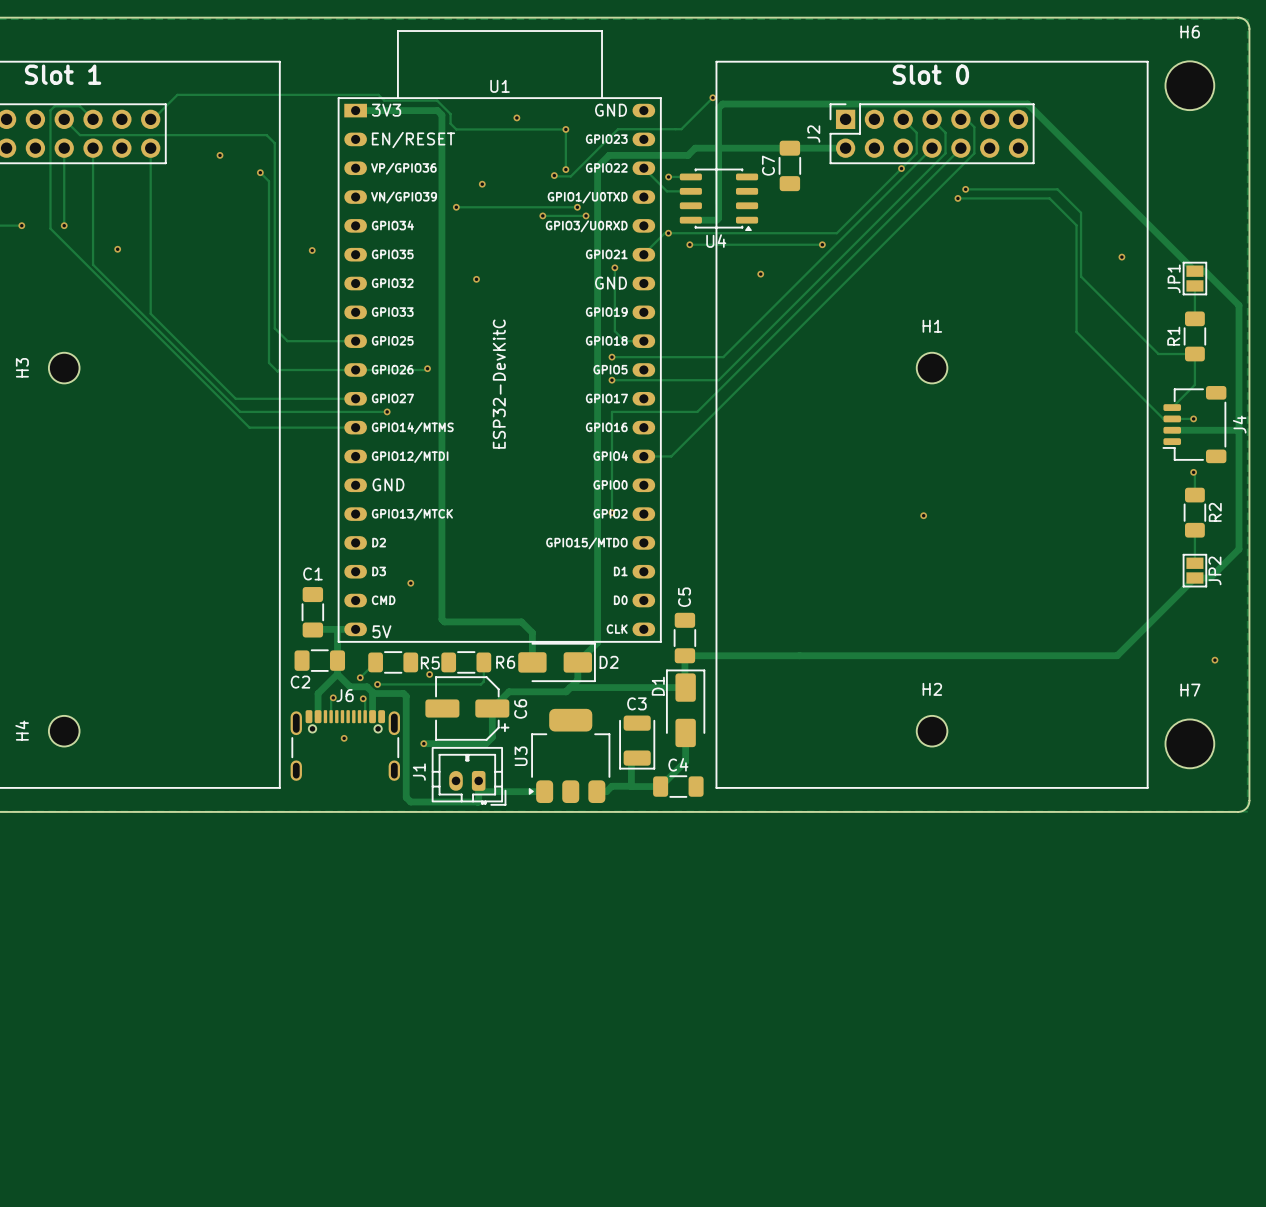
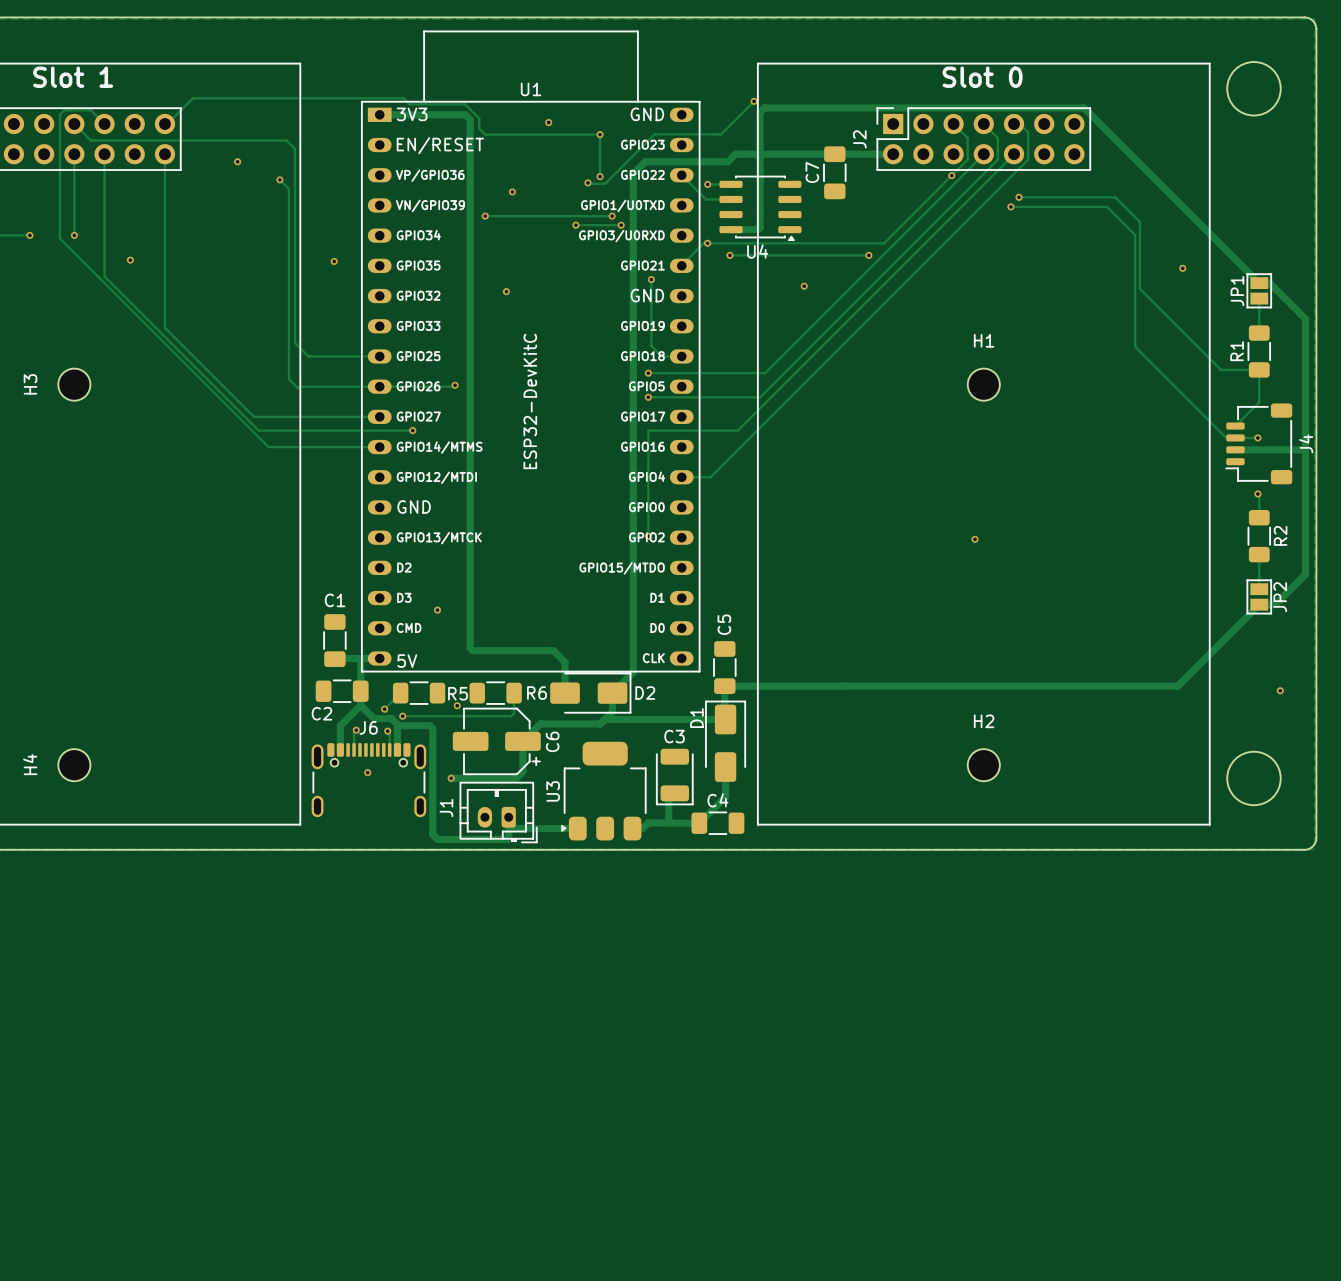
round board edge: none -> [1226, 61, 1282, 117]
H6: (1189, 85) -> none
round board edge: none -> [1226, 751, 1282, 806]
H7: (1189, 743) -> none

